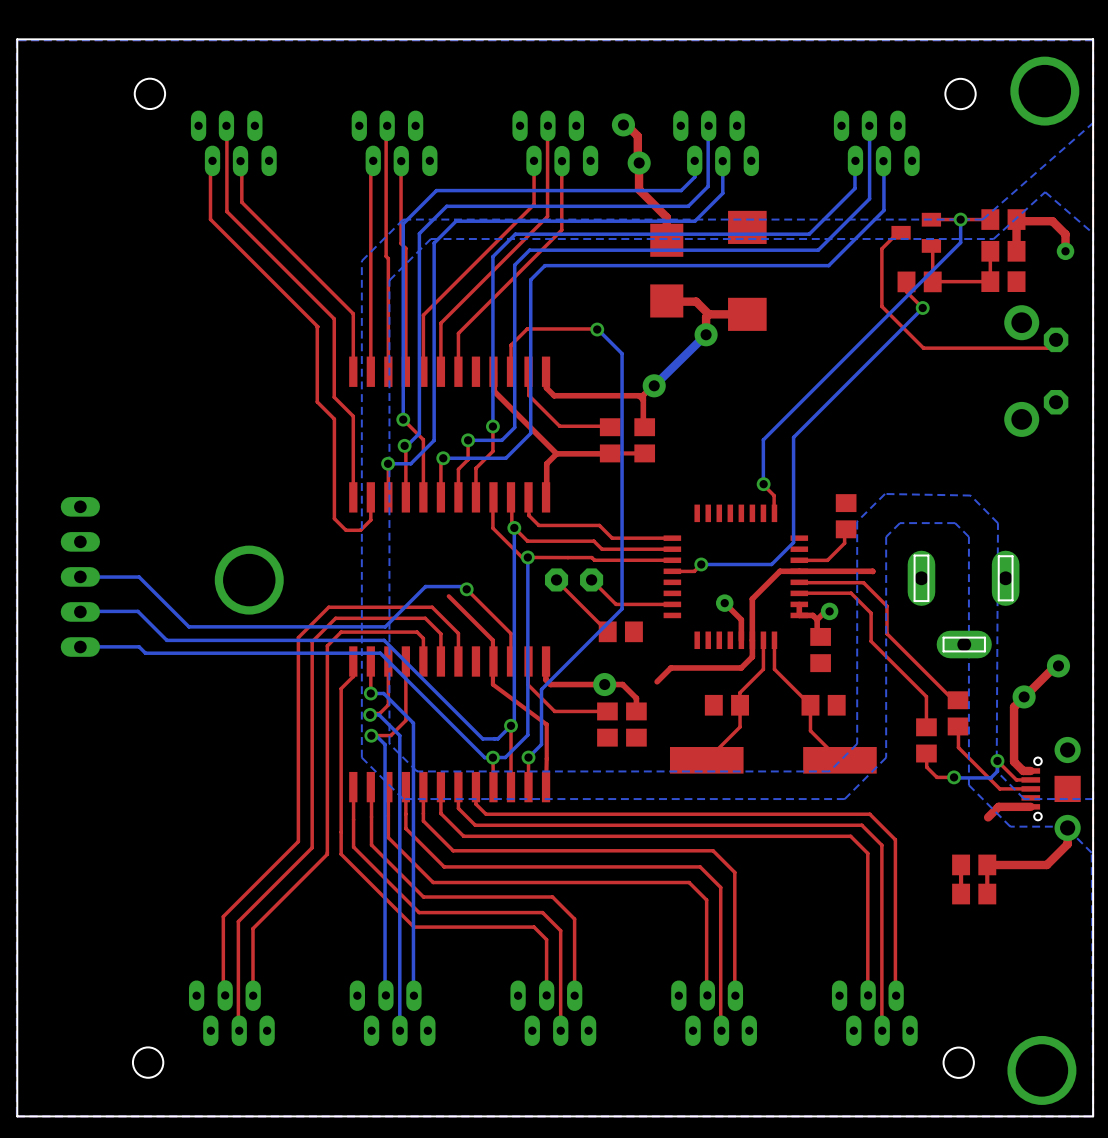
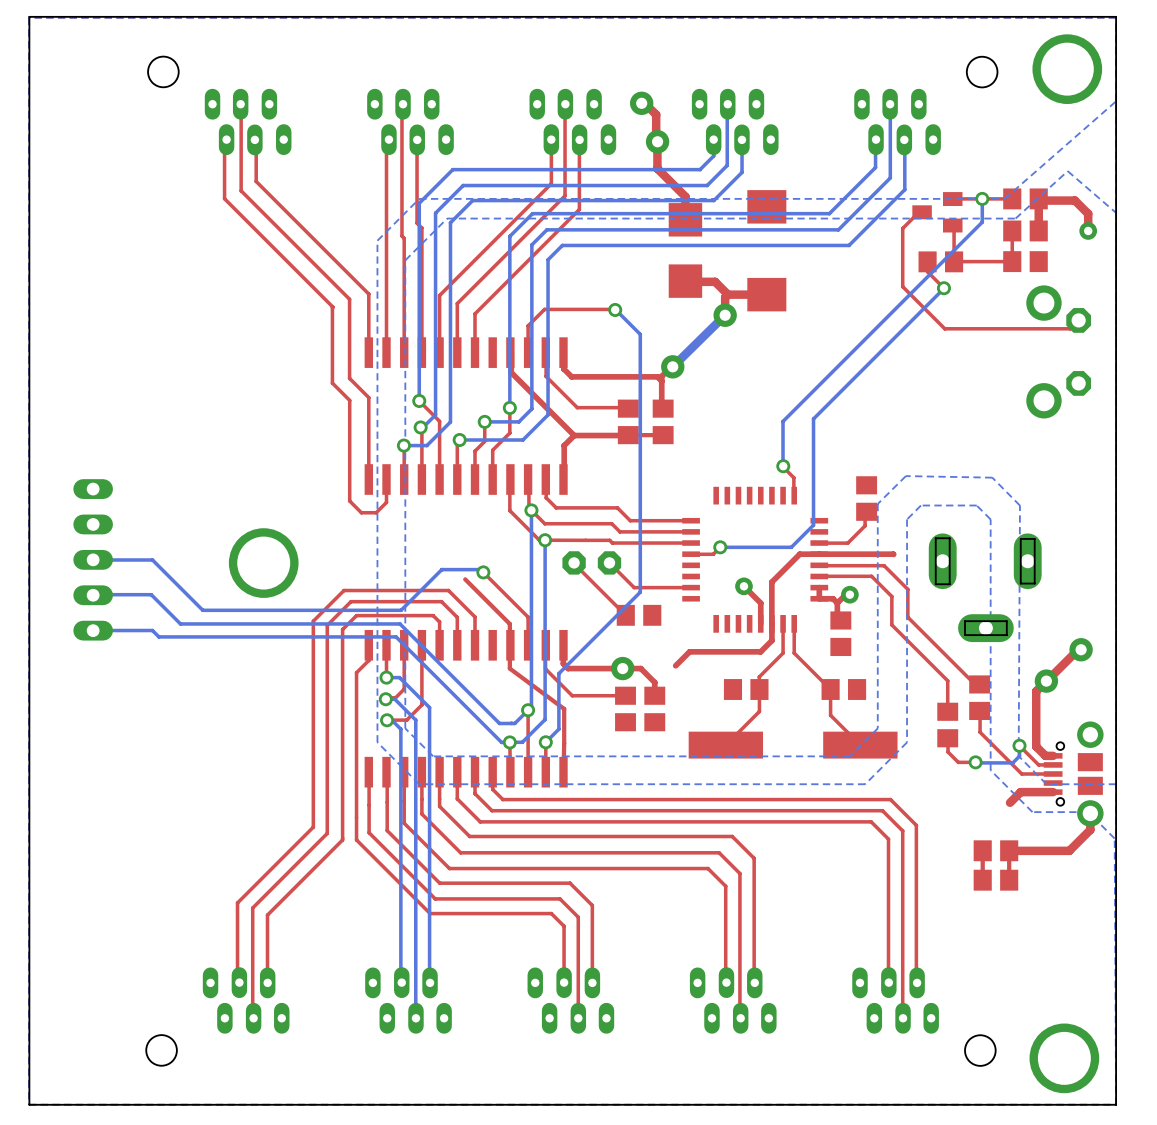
part footprint: [1021, 736, 1081, 842] -> [1043, 721, 1104, 827]

